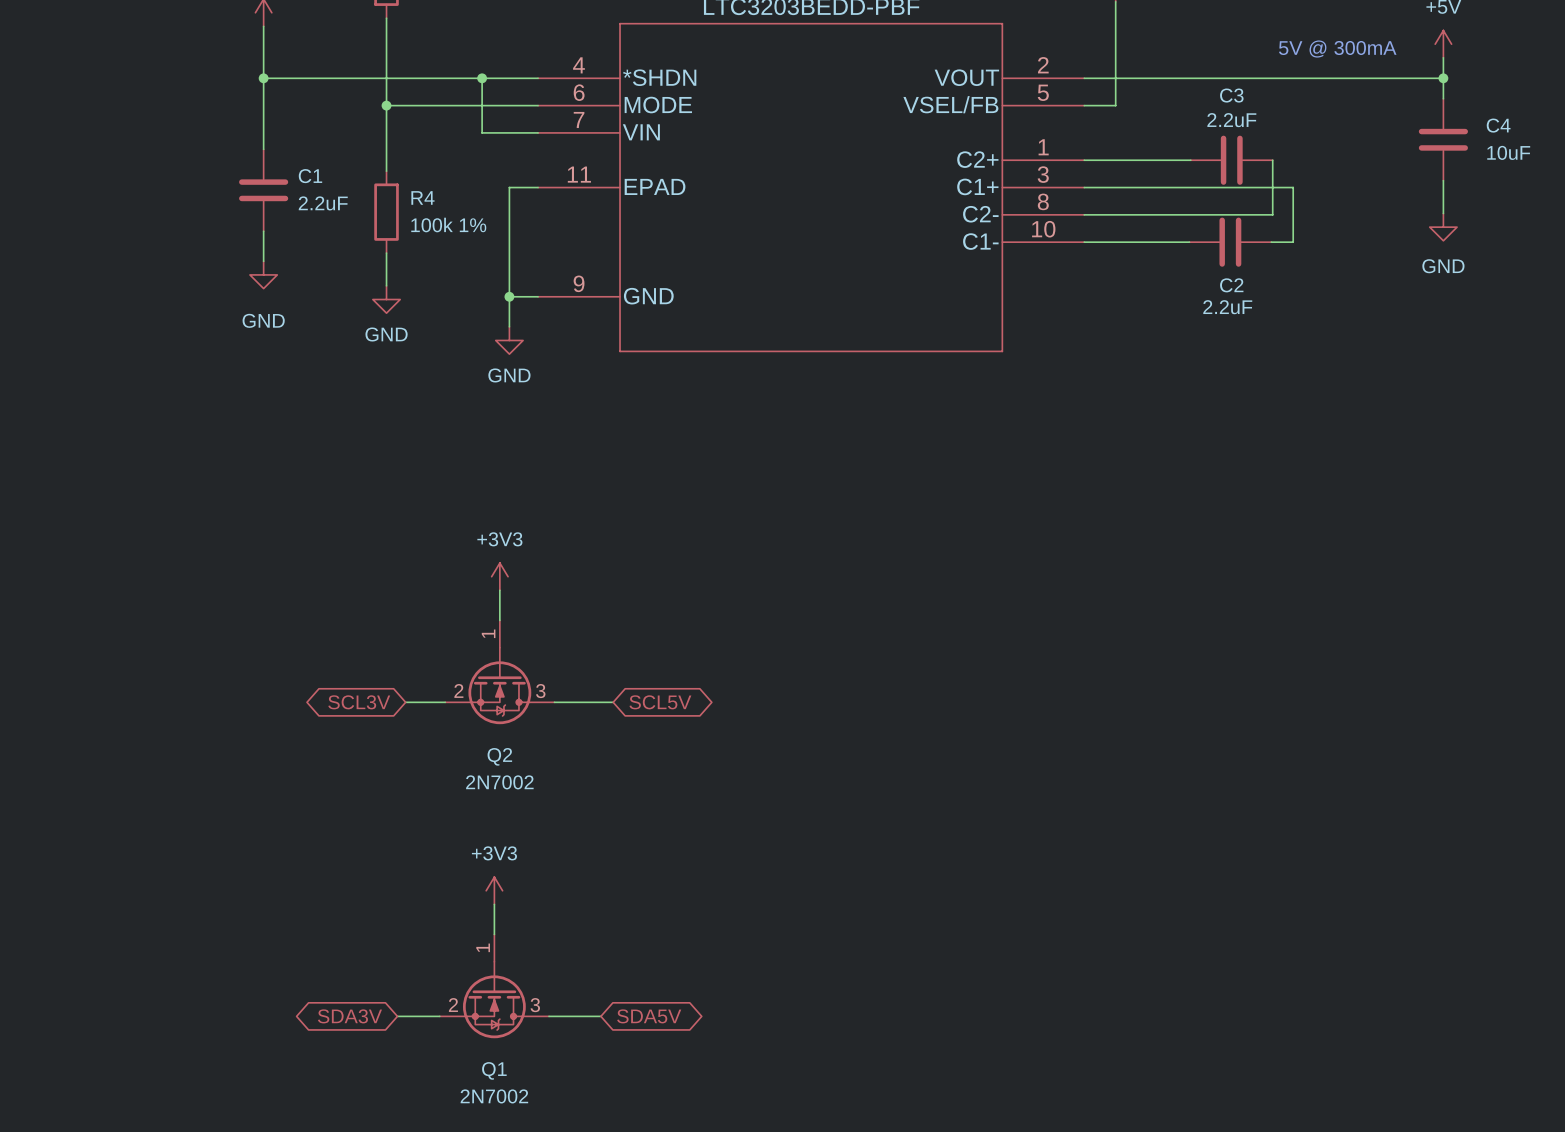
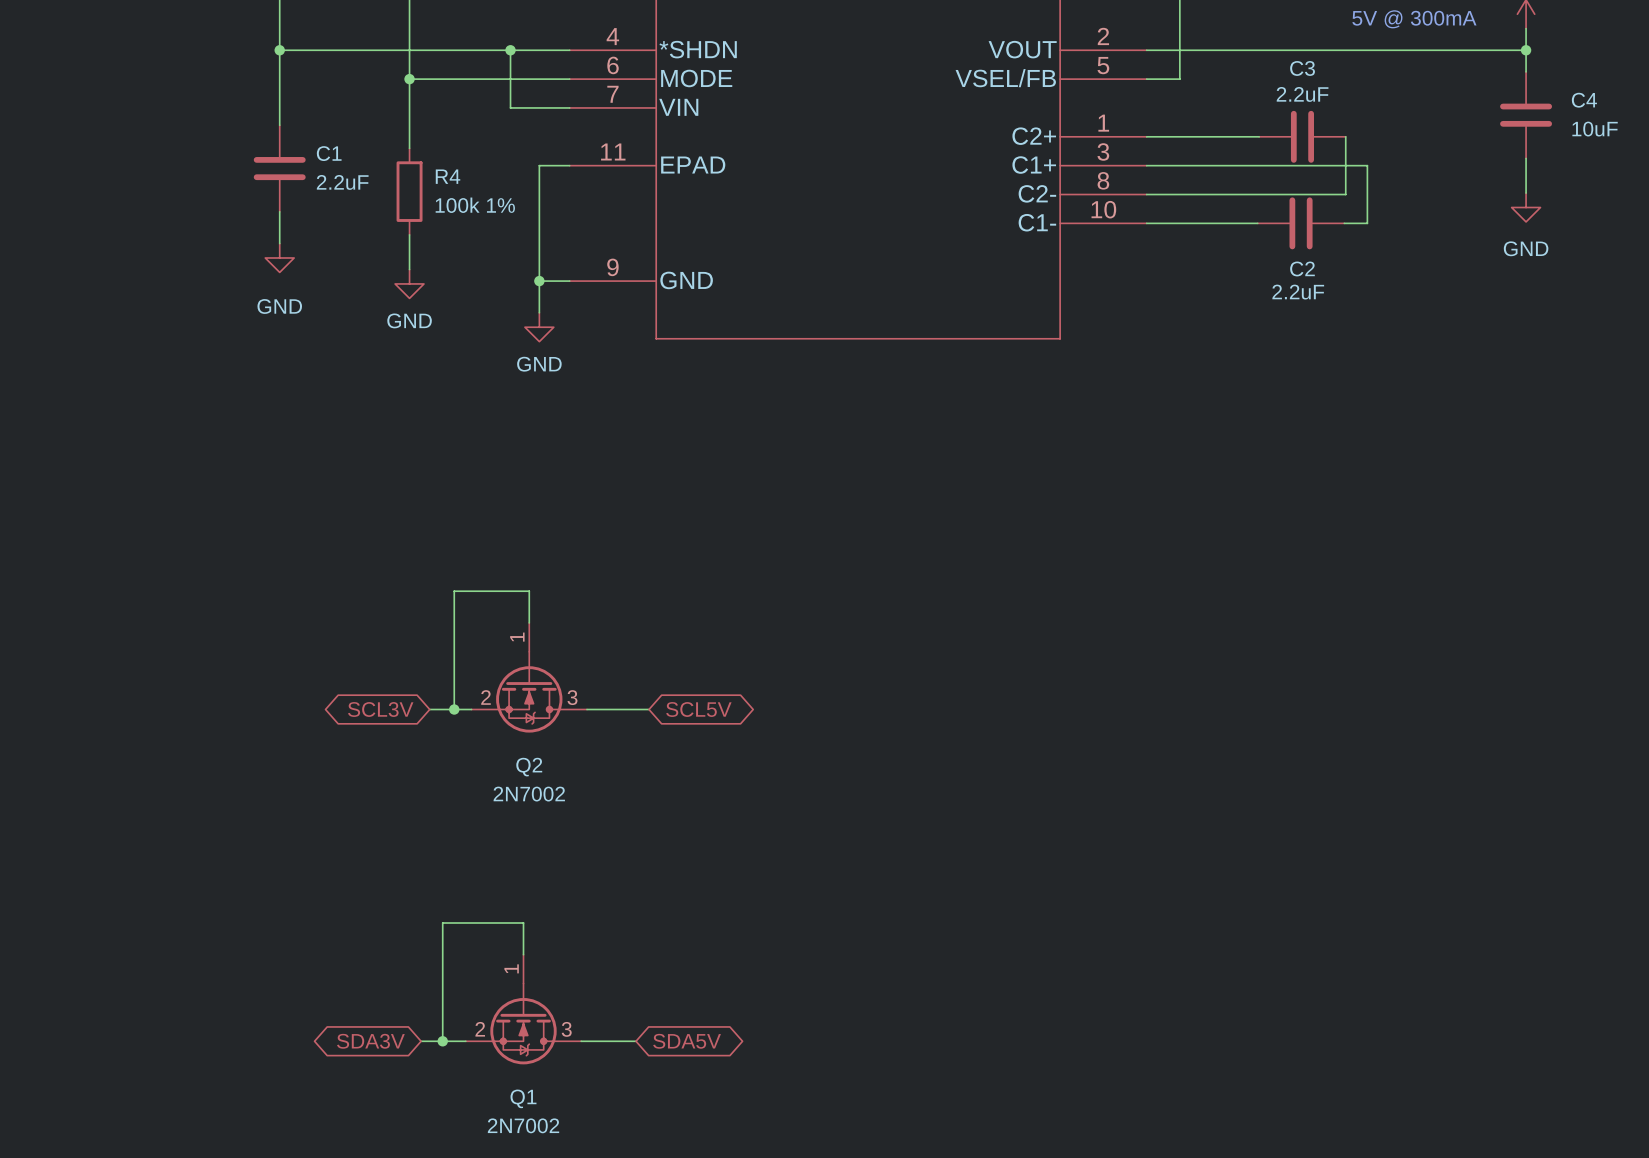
power symbol: +3V3 (499, 576) -> none
wire: none -> (529, 591) (454, 591) (454, 709)
junction: none -> (454, 709)
power symbol: +3V3 (494, 890) -> none
wire: none -> (523, 923) (442, 923) (442, 1041)
junction: none -> (442, 1041)

